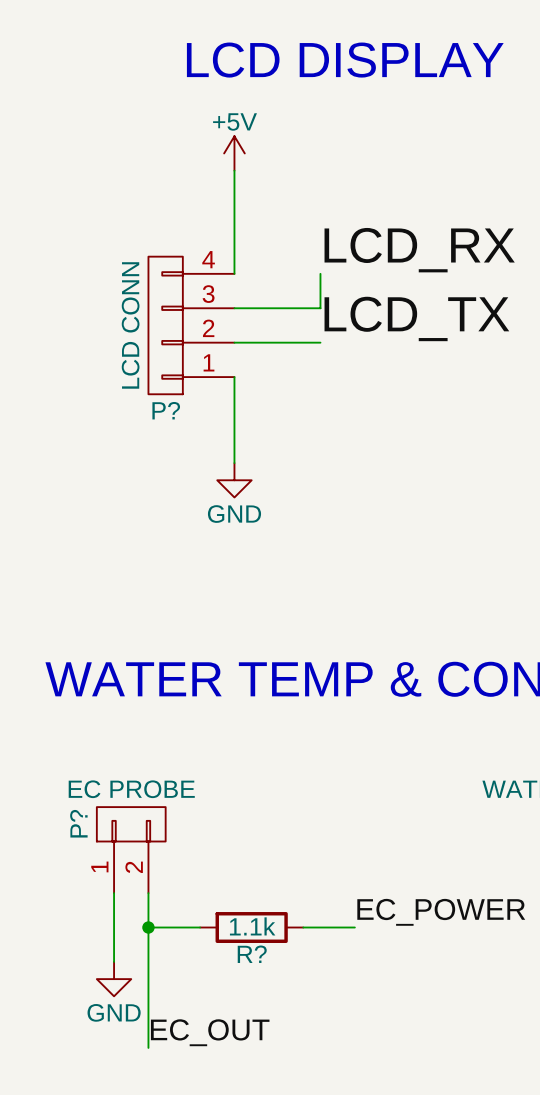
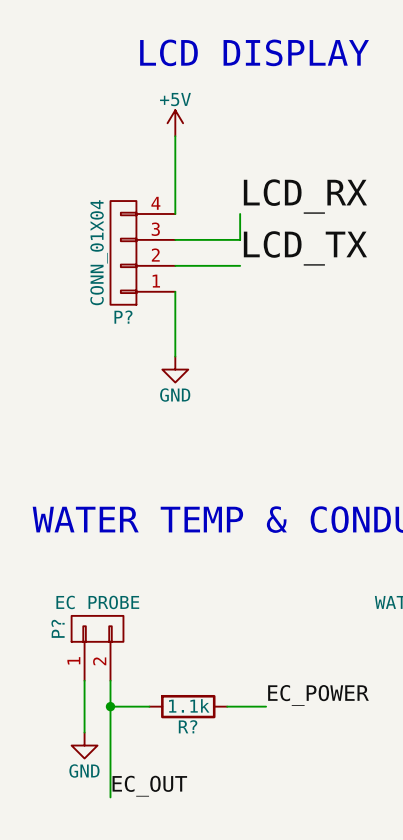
P? value: LCD CONN (130, 325) -> CONN_01X04 (99, 252)

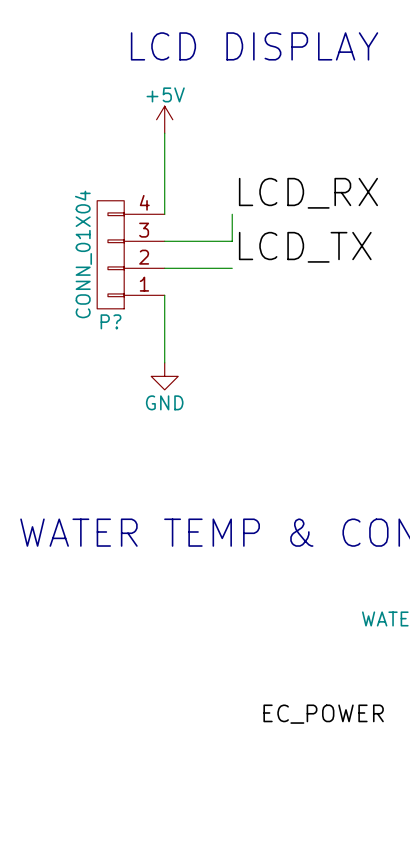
P?: EC PROBE (97, 648) -> none
wire: (84, 680) (84, 732) -> none
wire: (110, 680) (110, 797) -> none
wire: (110, 706) (149, 706) -> none
junction: (110, 706) -> none
R?: 1.1k (188, 706) -> none
wire: (227, 706) (266, 706) -> none
power symbol: GND (84, 745) -> none
label: EC_OUT (149, 786) -> none

